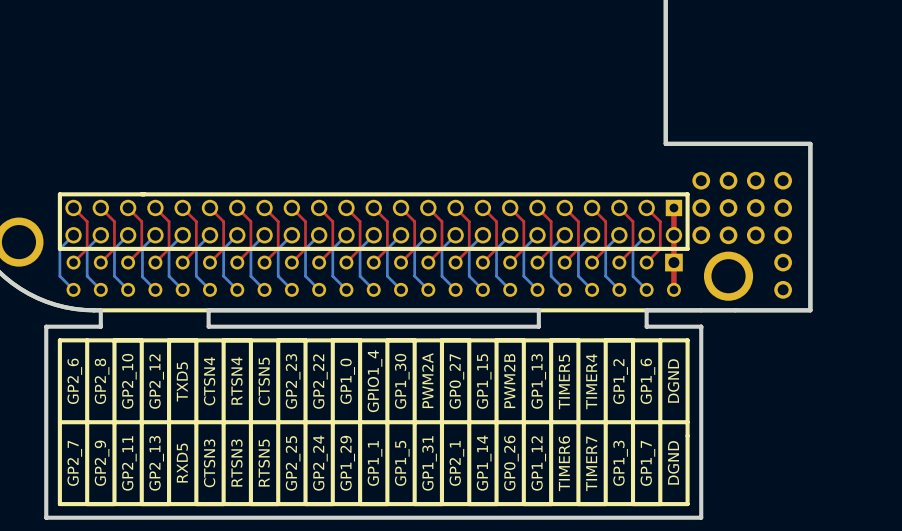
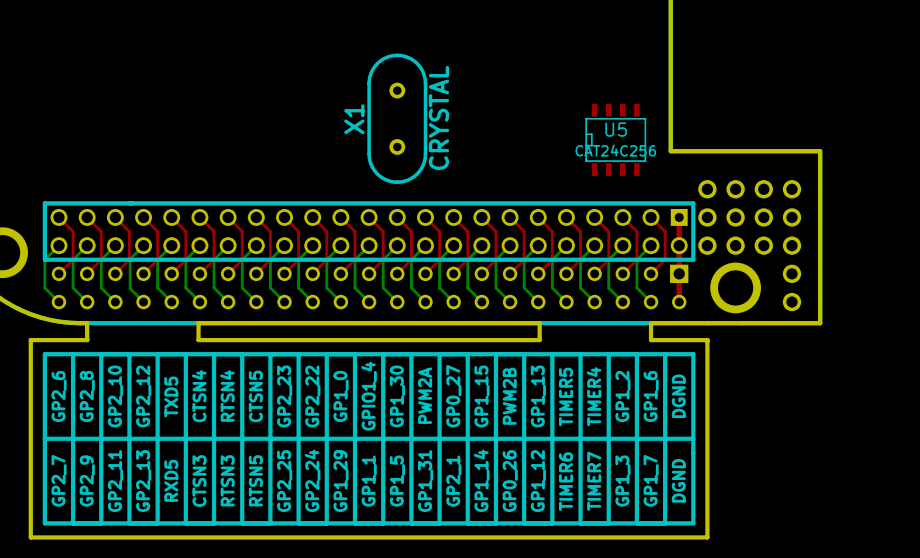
X1: none -> CRYSTAL (397, 118)
U5: none -> CAT24C256 (615, 139)

